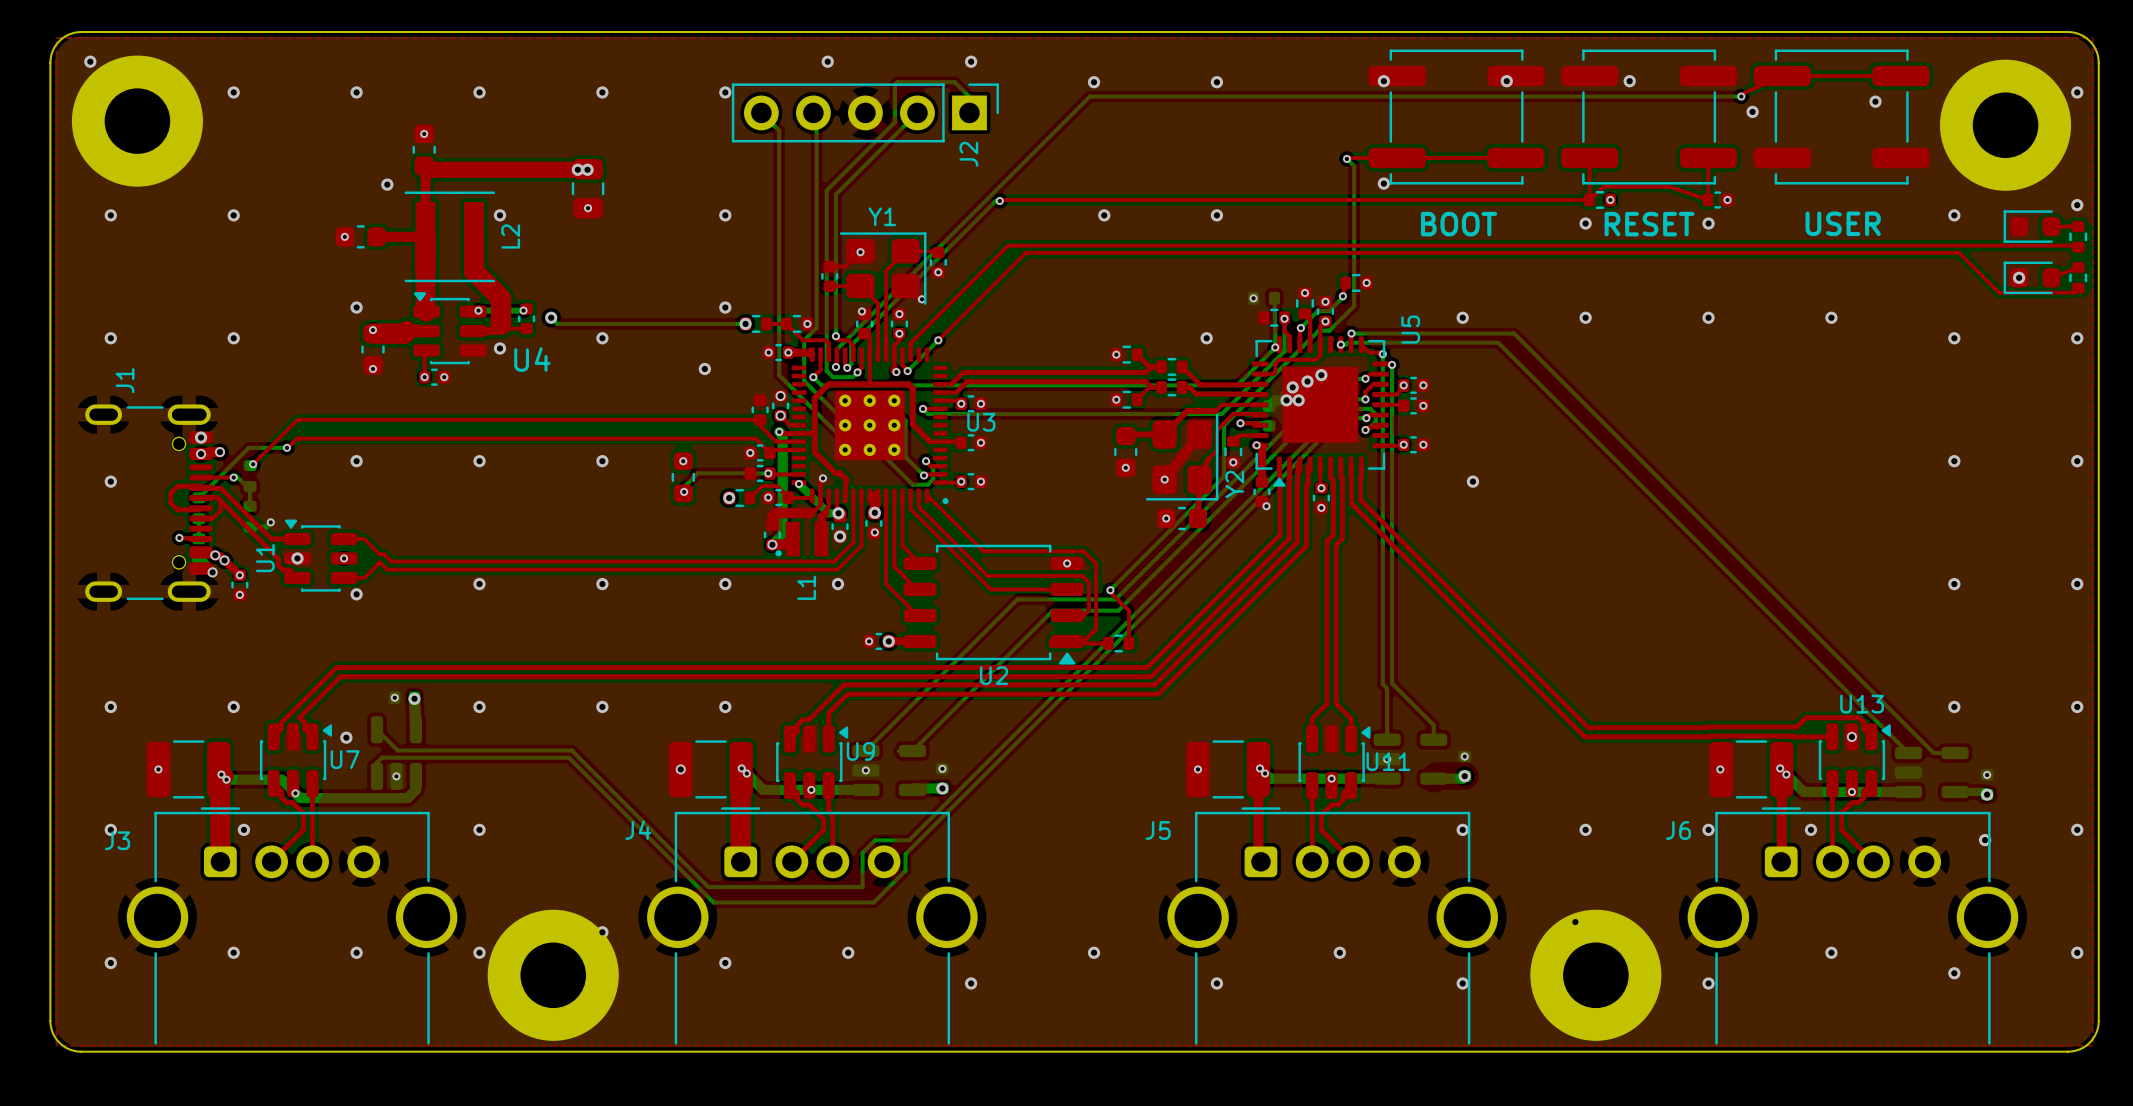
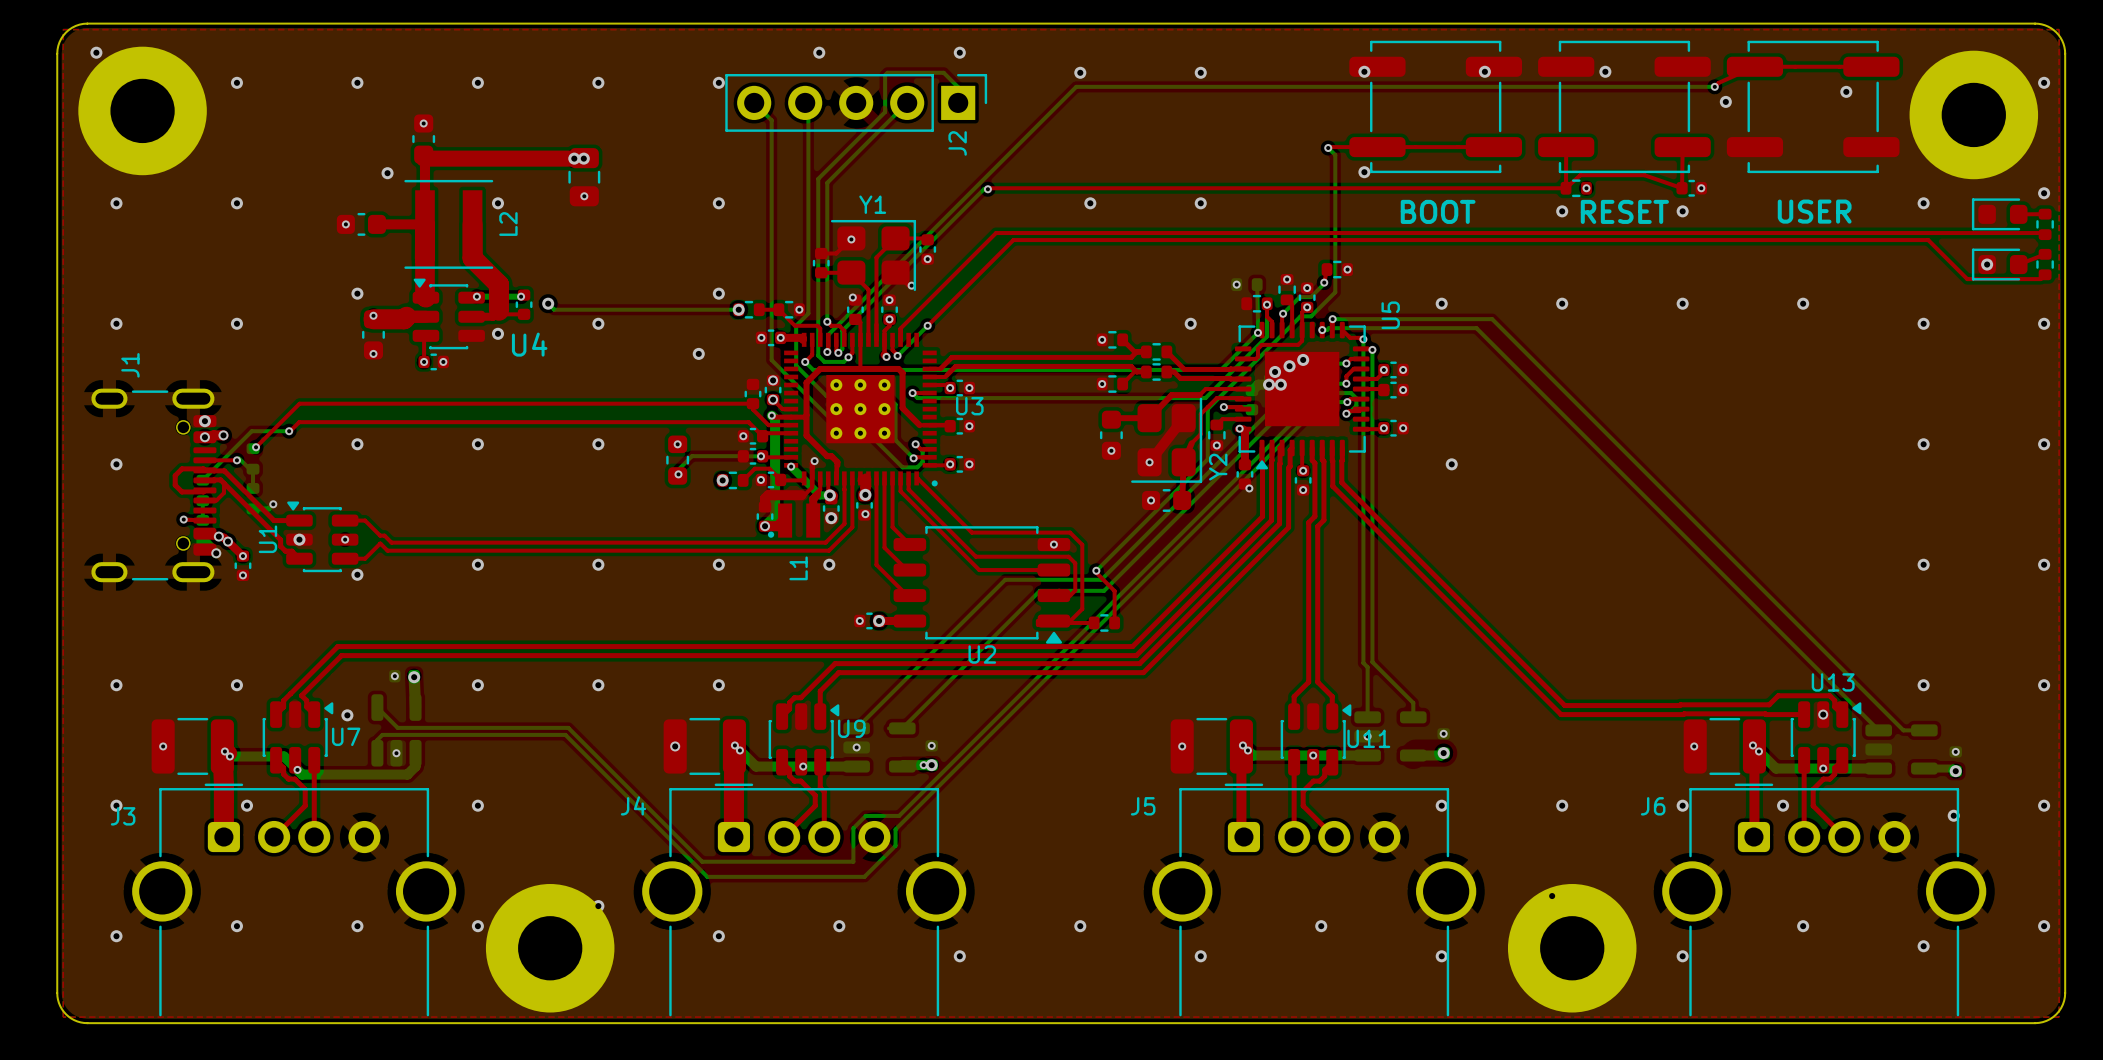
via: none -> (923, 765)

